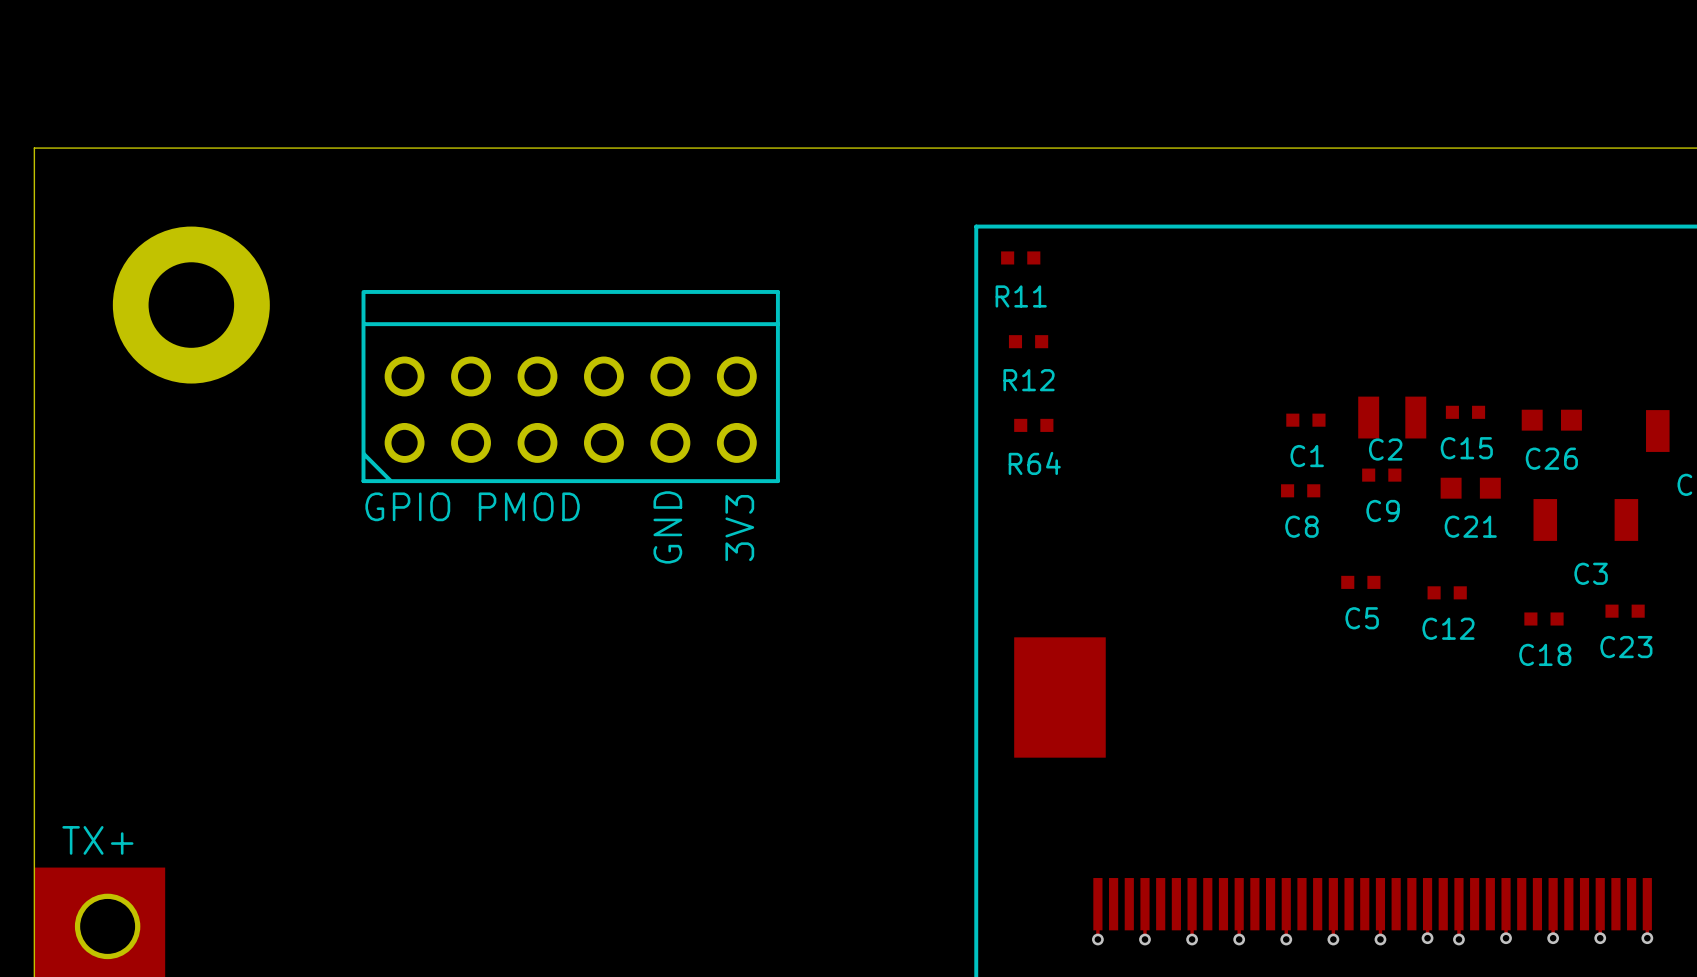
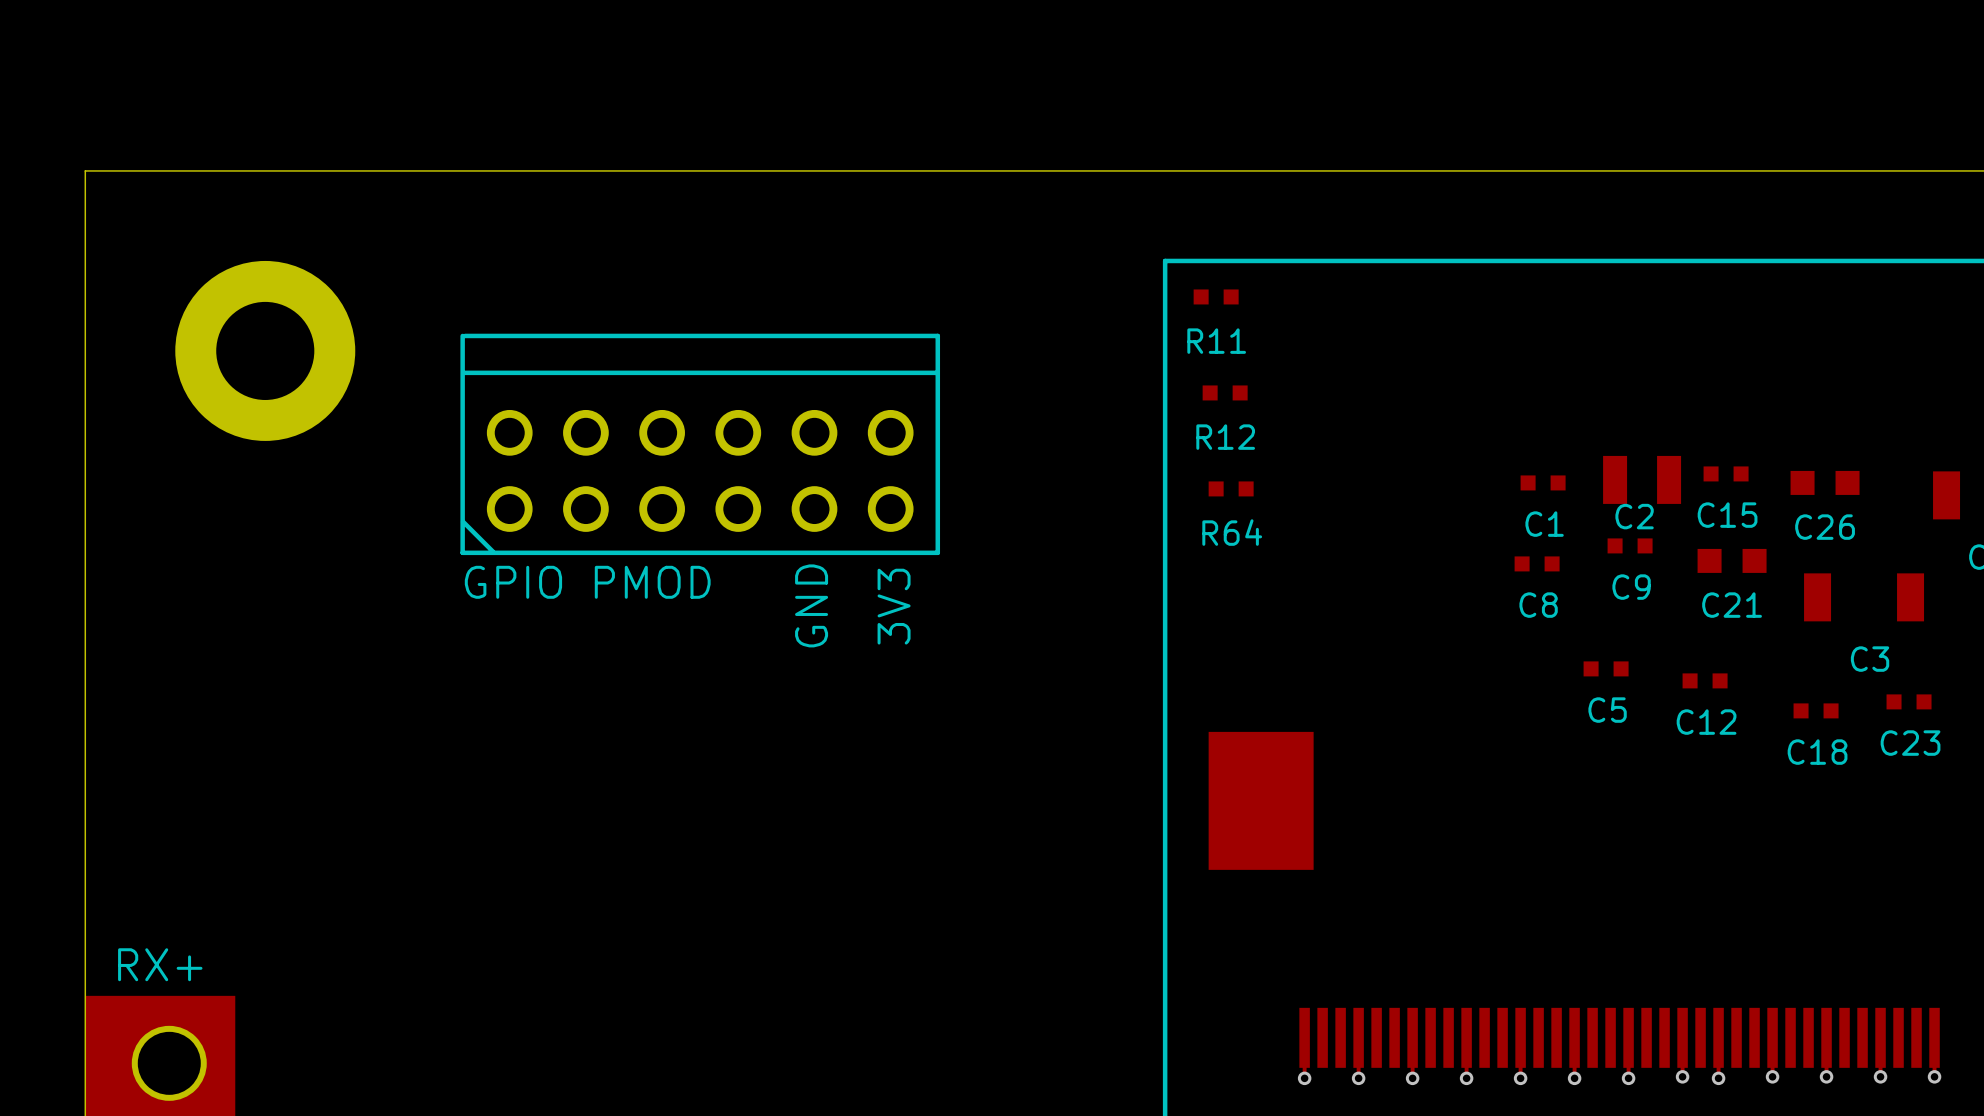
text: TX+ (97, 840) -> RX+ (160, 964)

